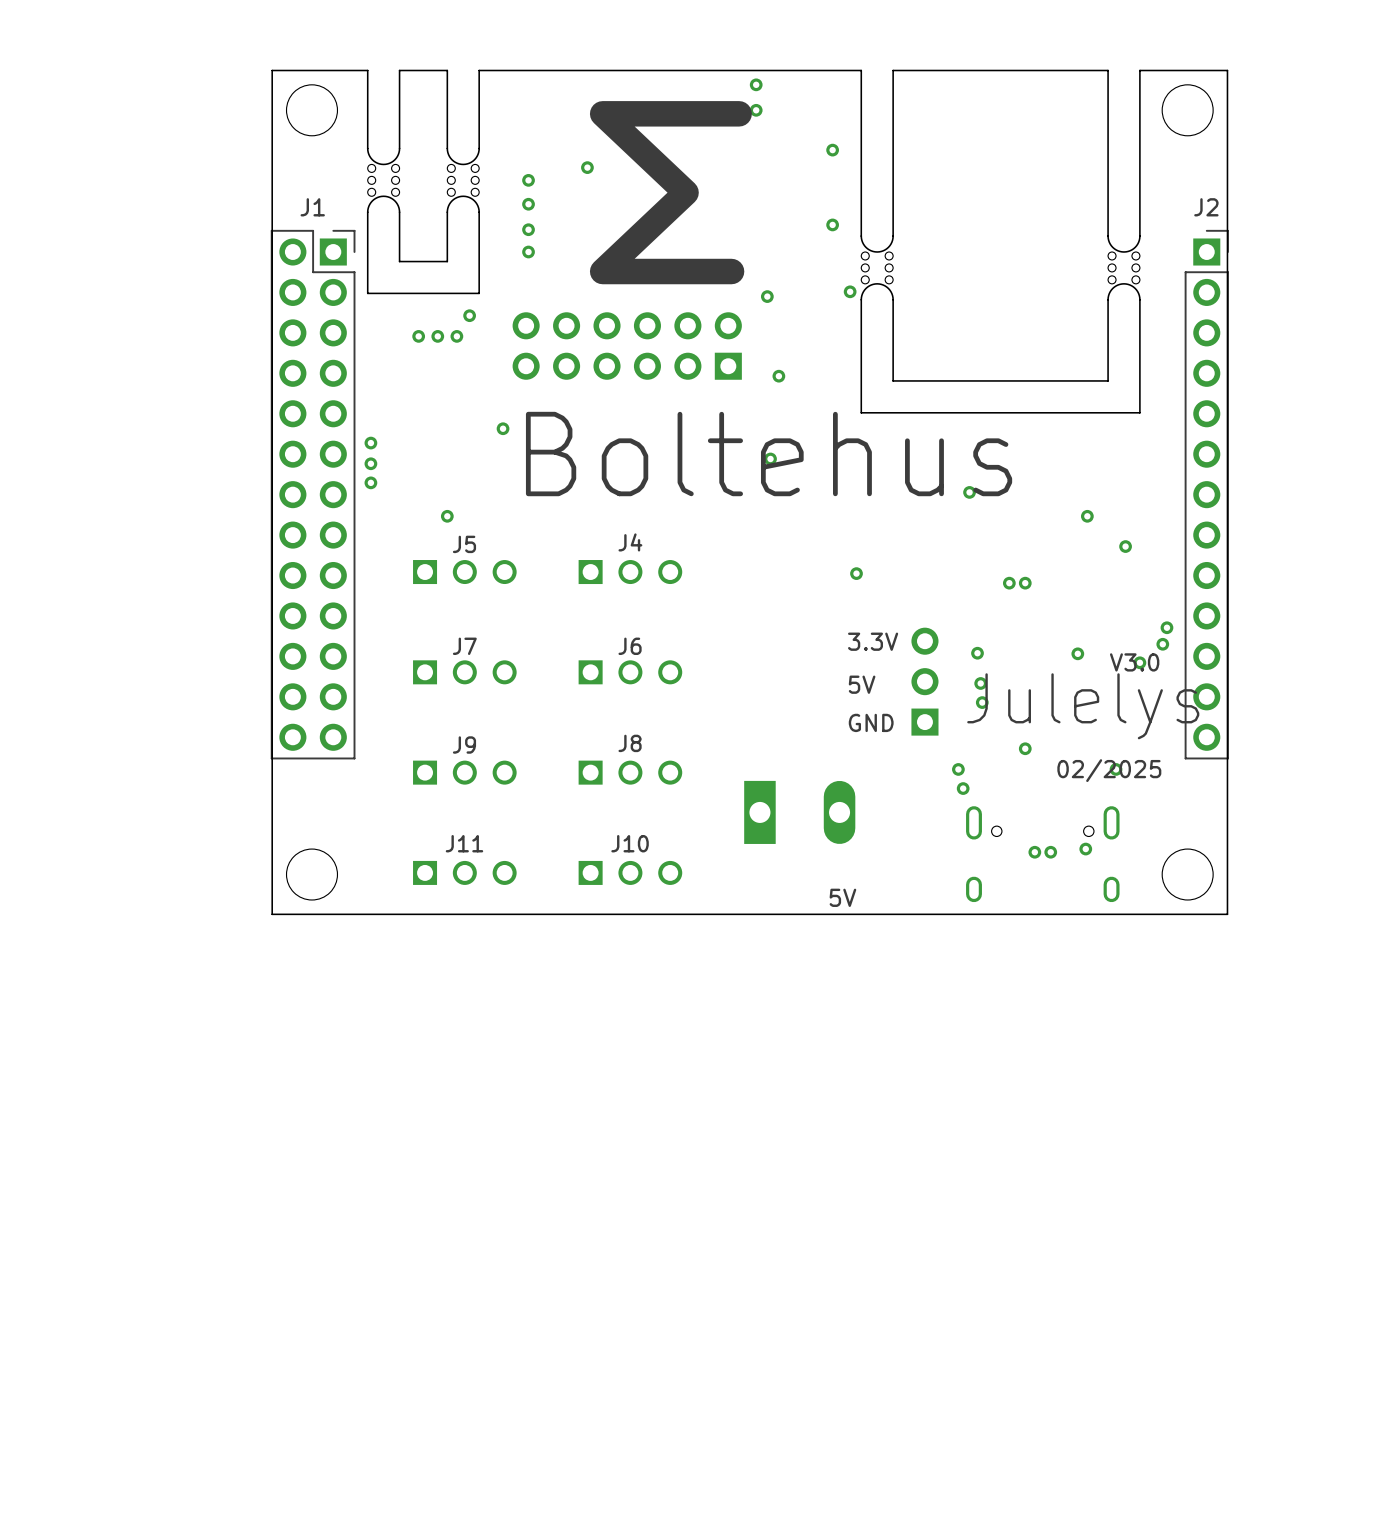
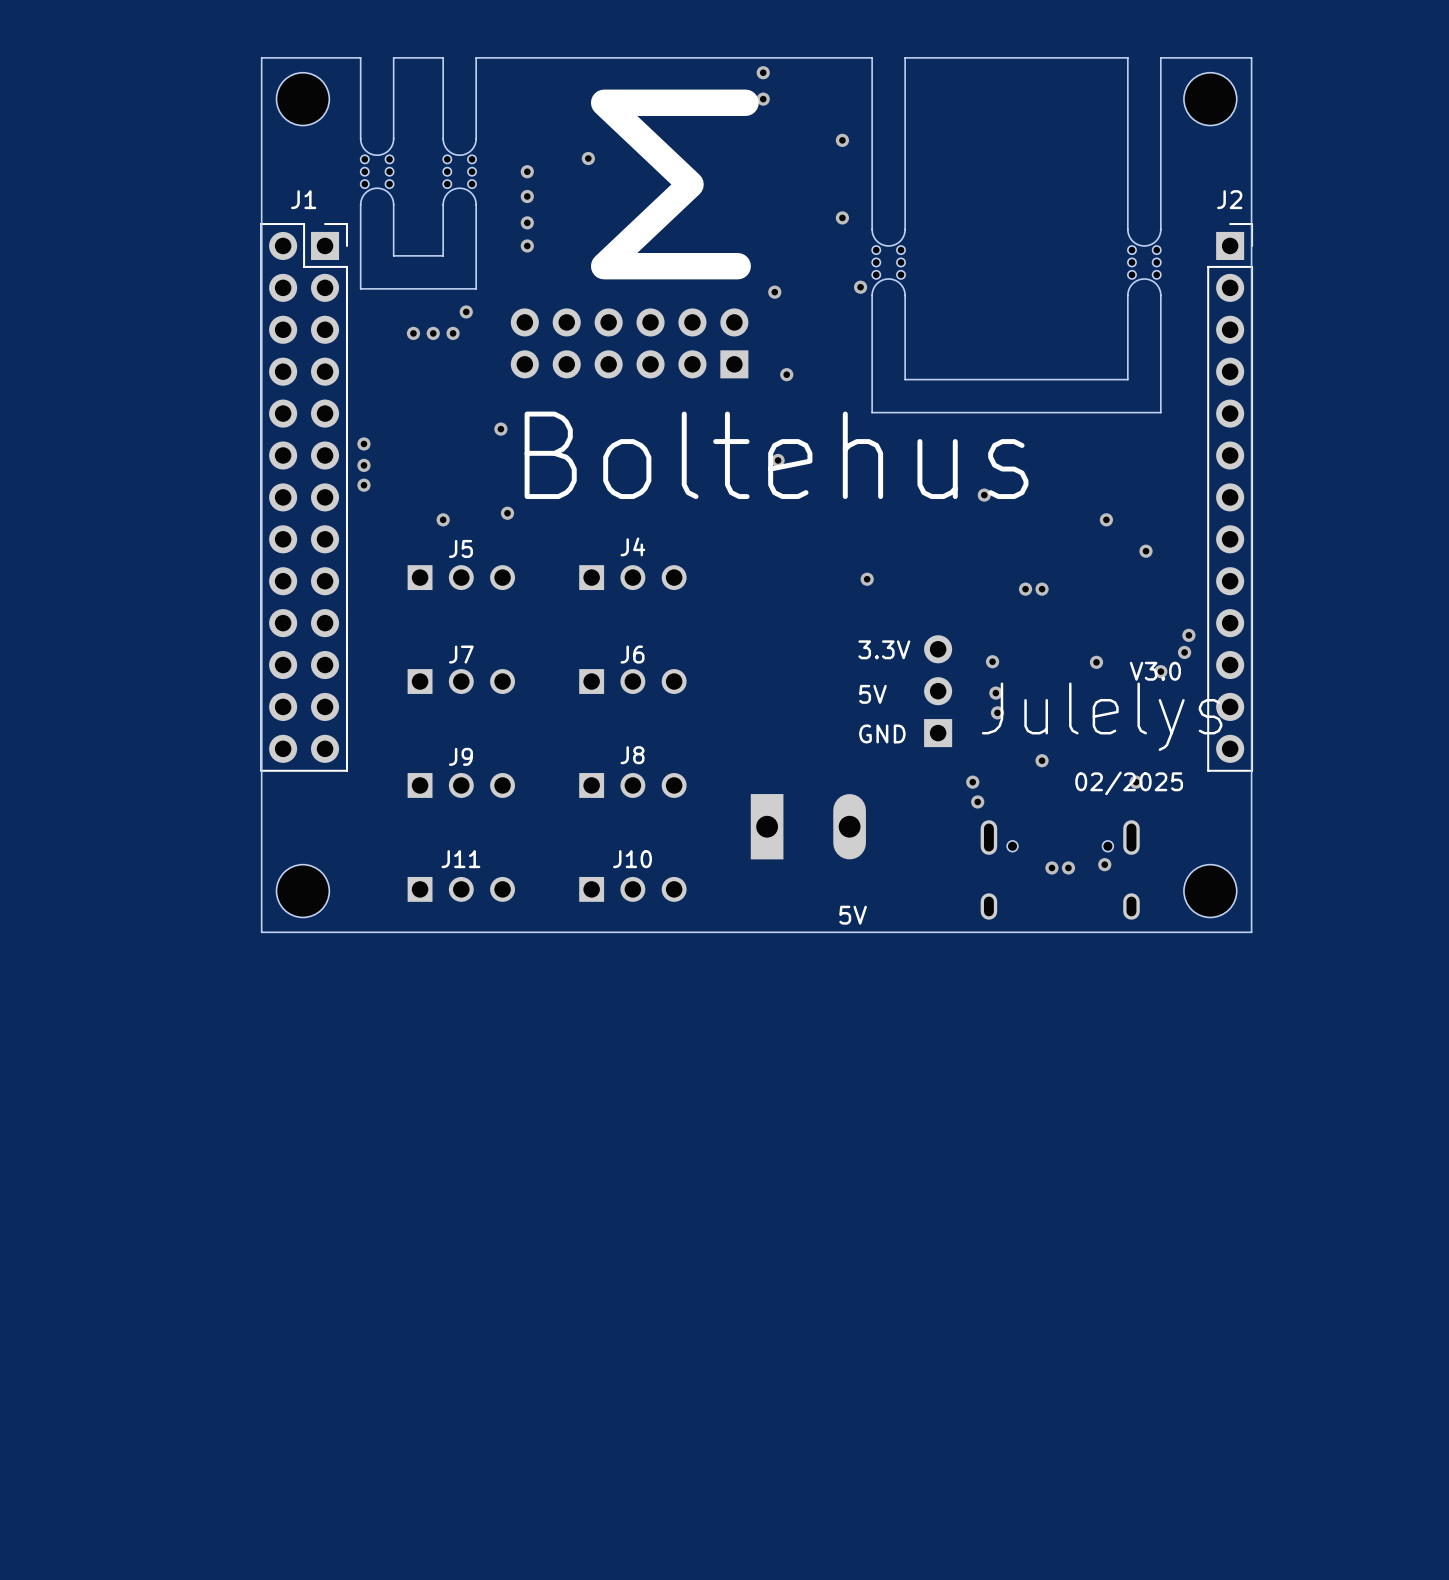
via: none -> (507, 513)

